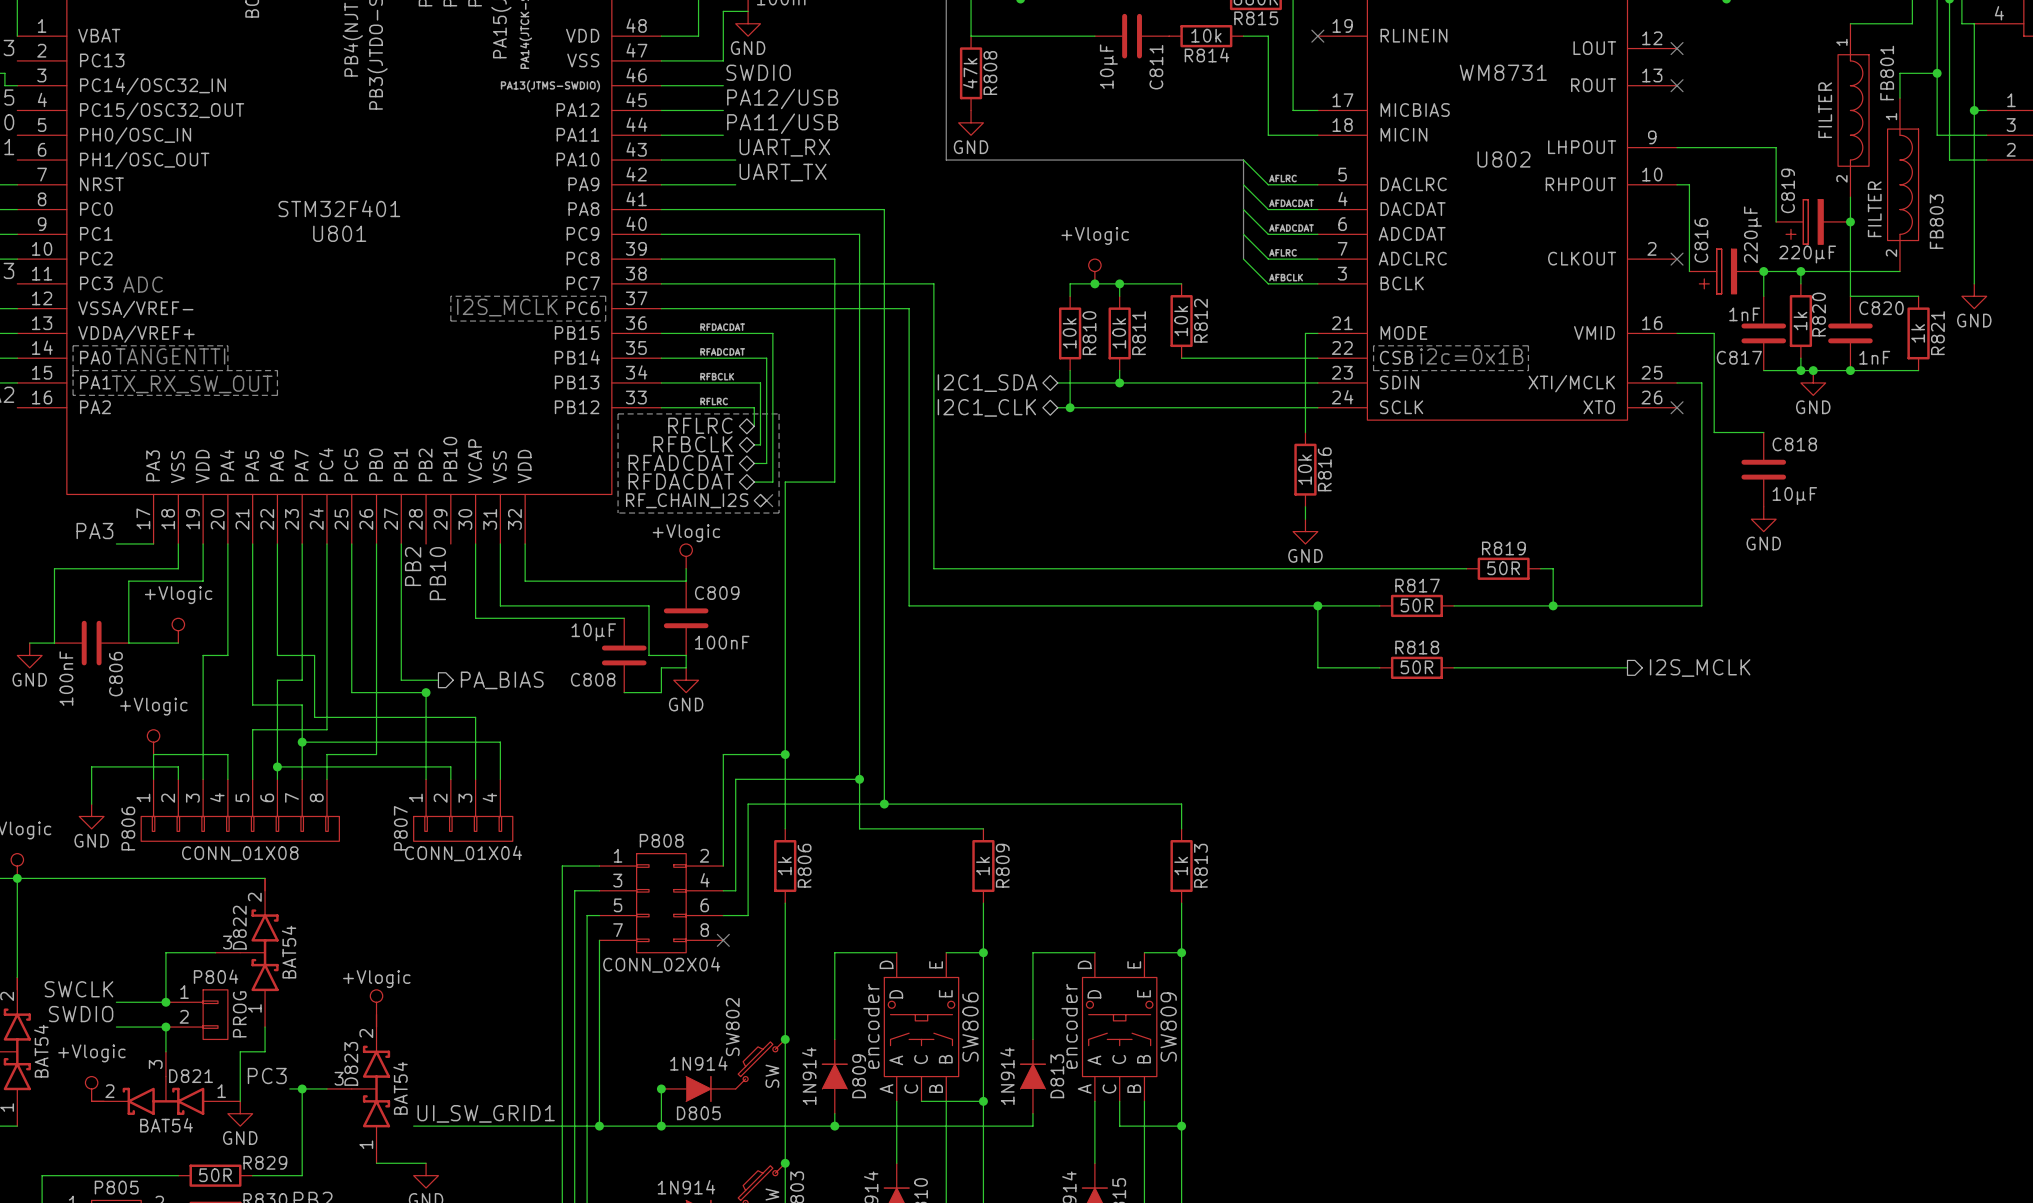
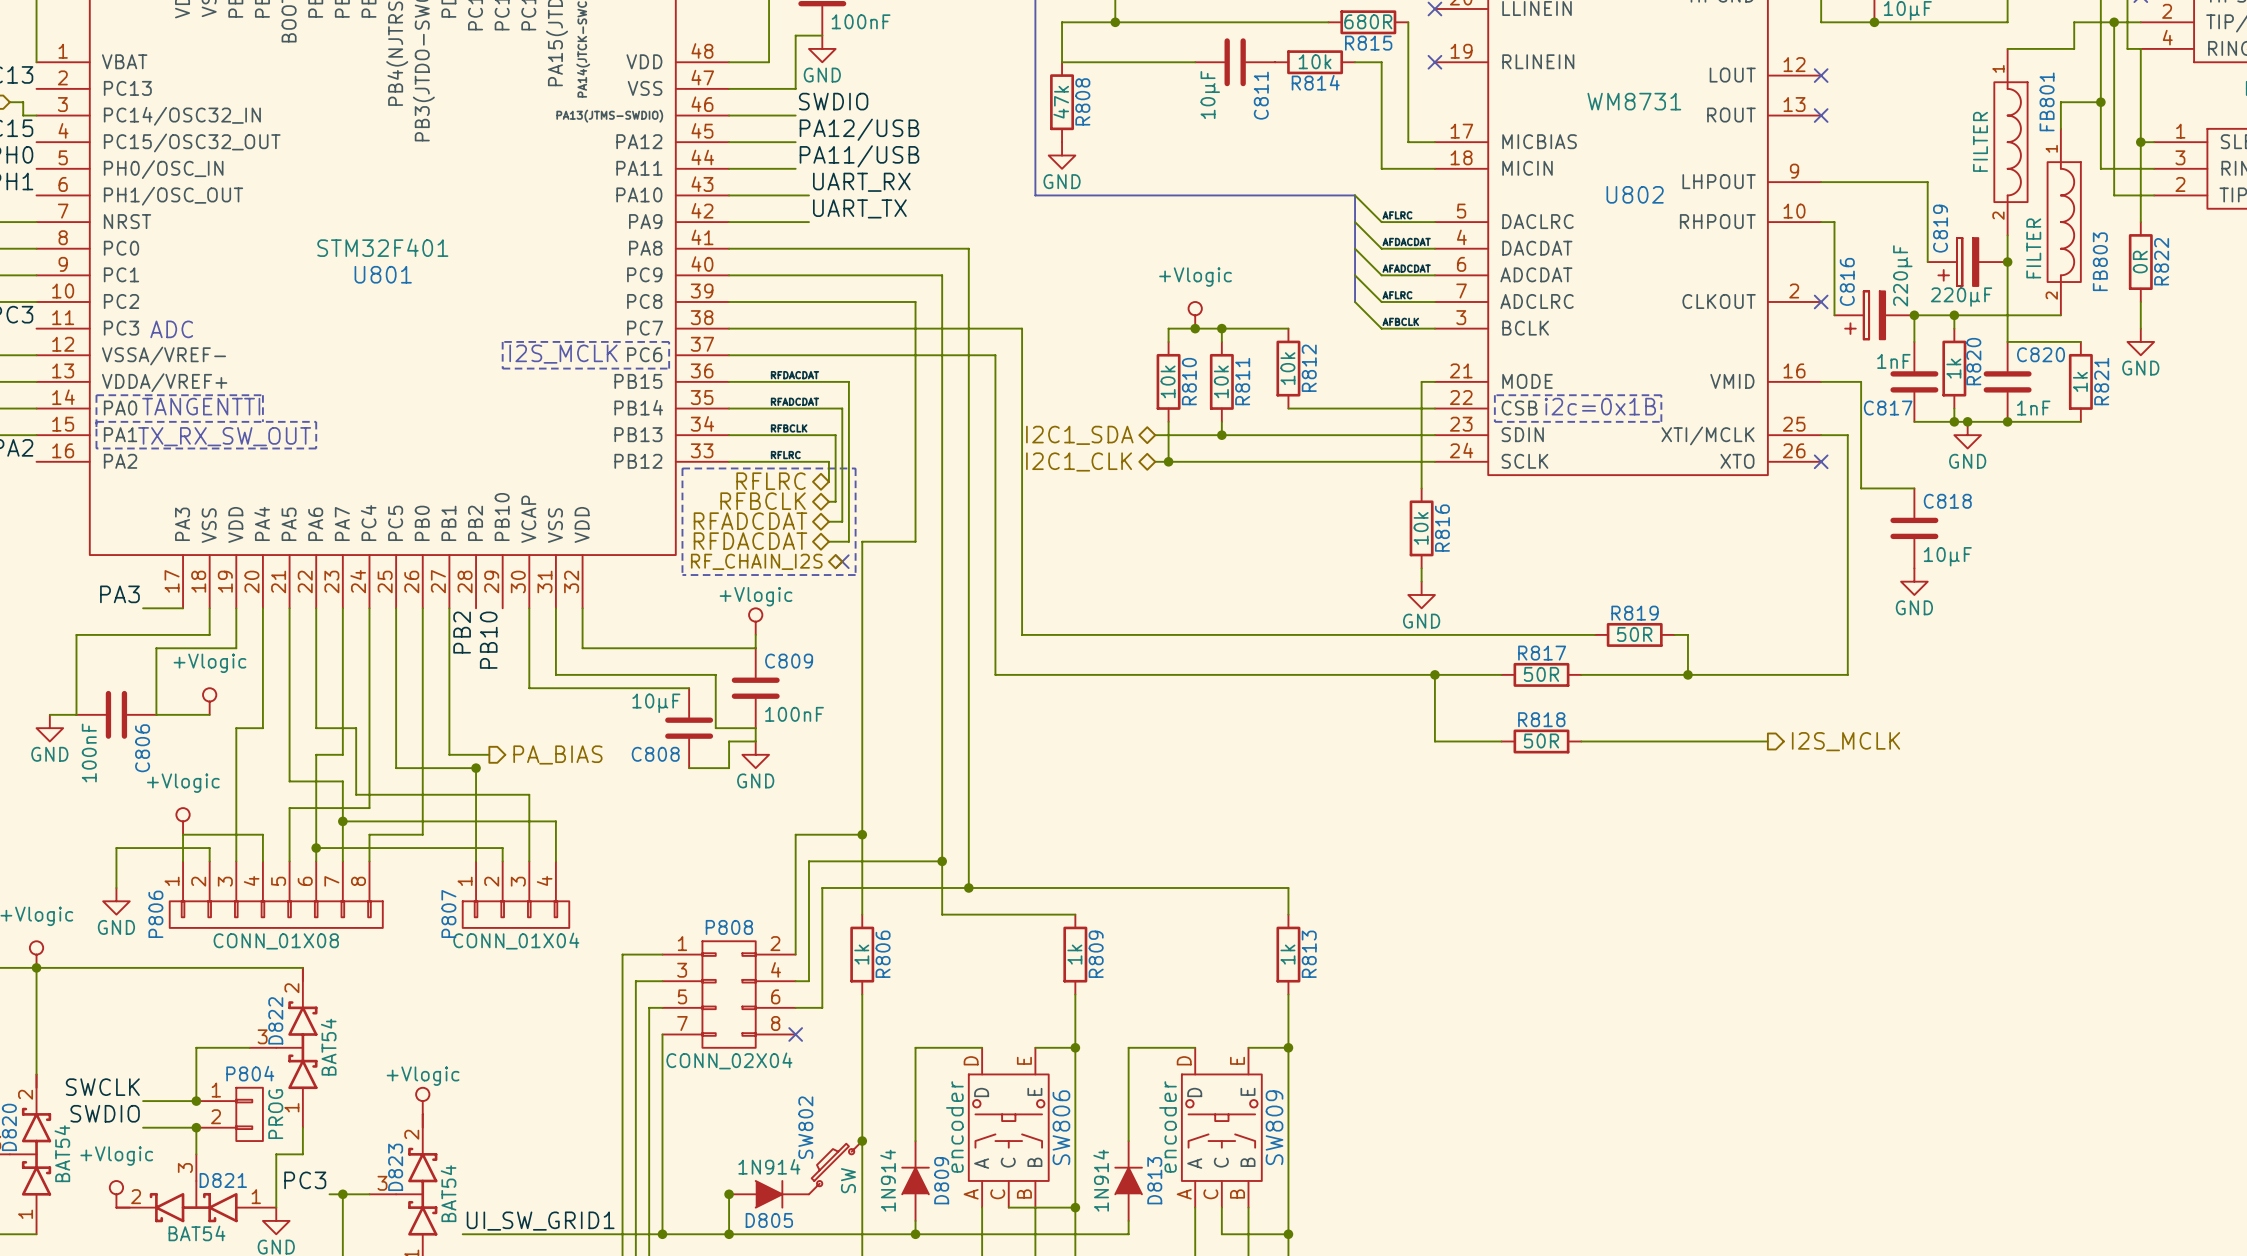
wire: (1974, 184) (1974, 259) -> none
R822: none -> 0R (2140, 262)

